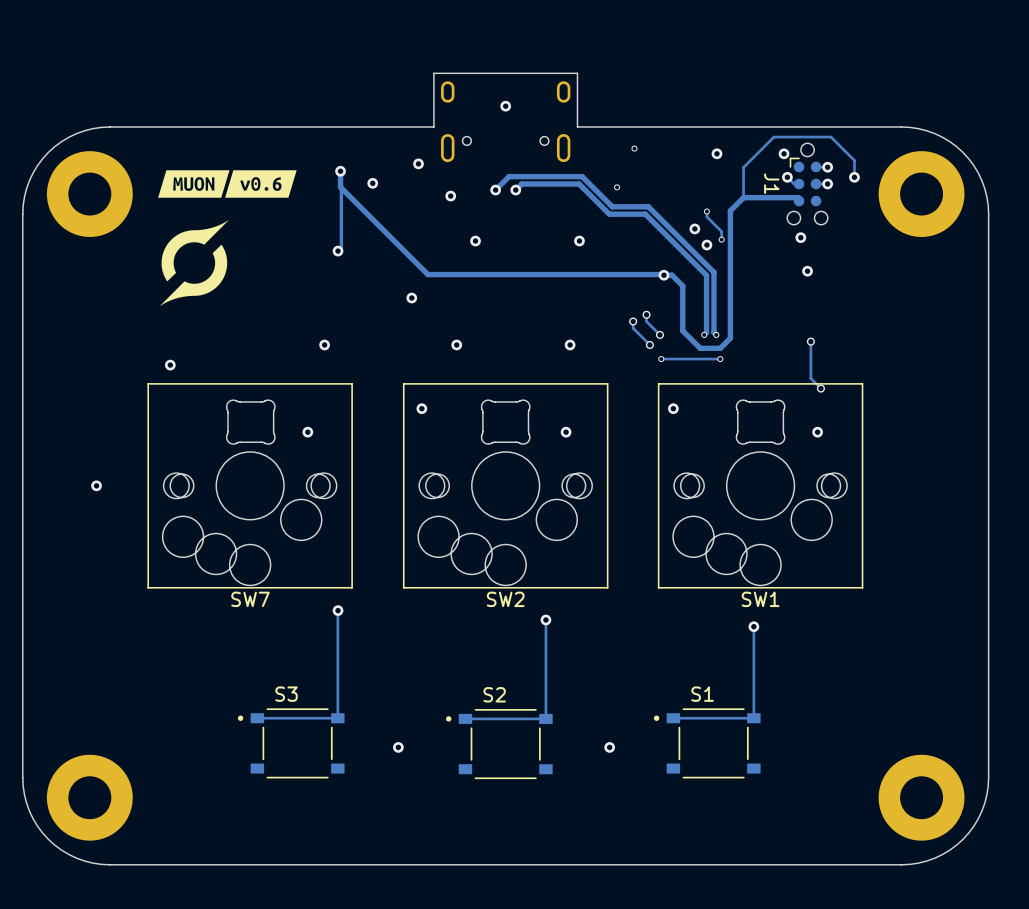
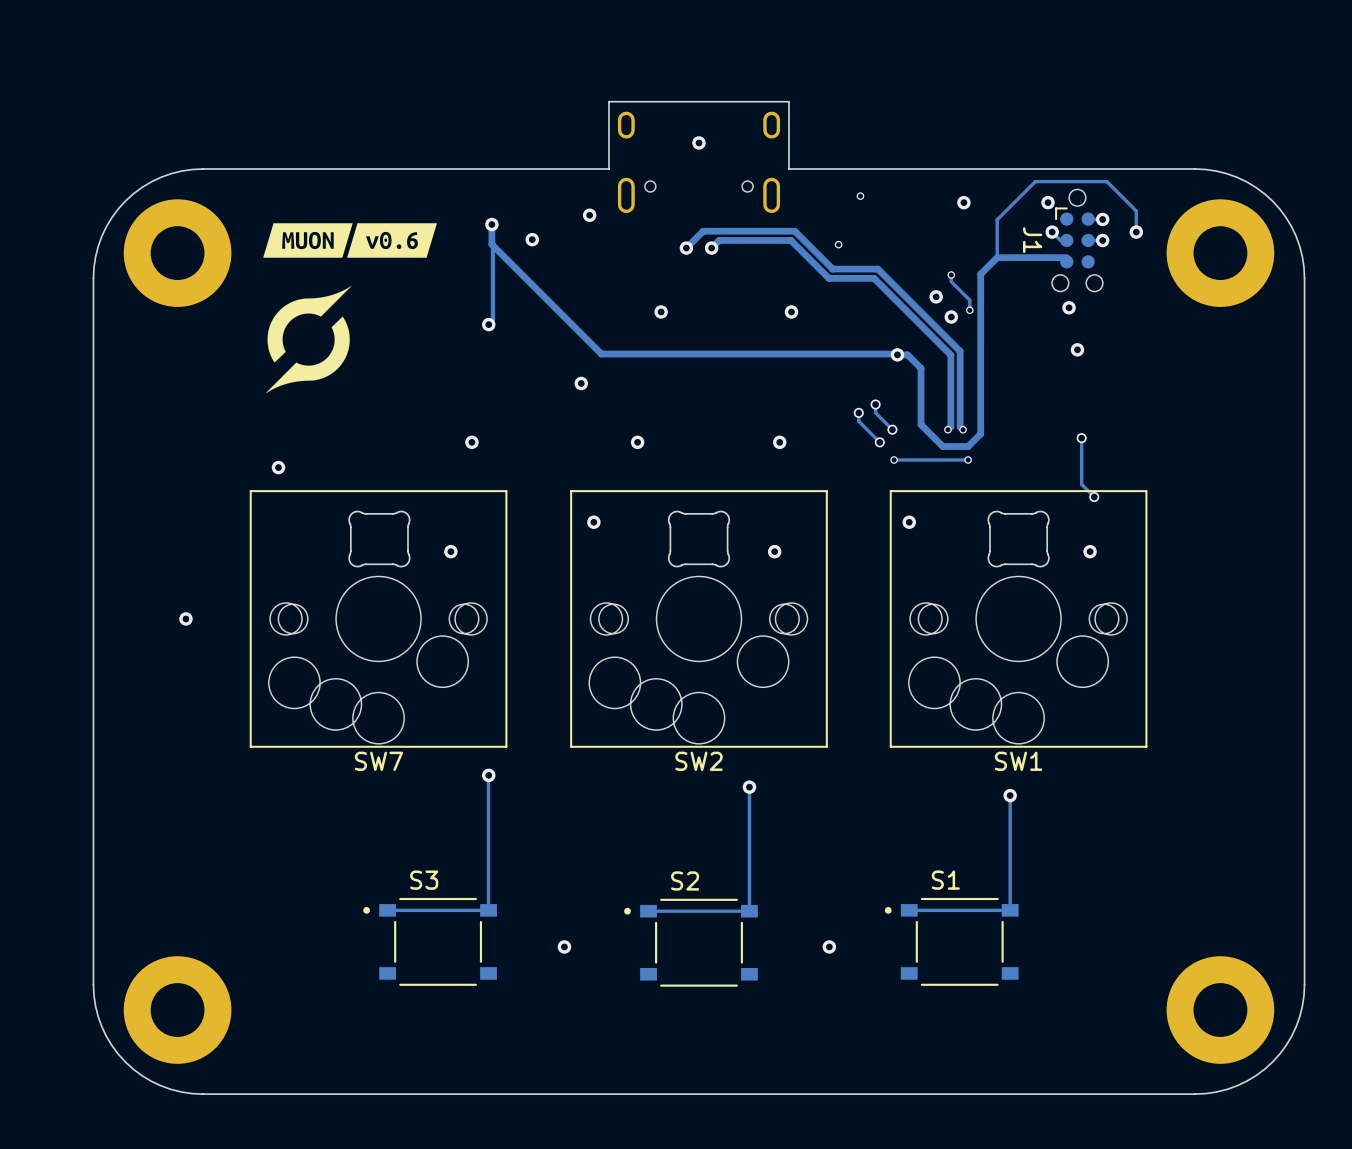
via: (450, 196) -> none

